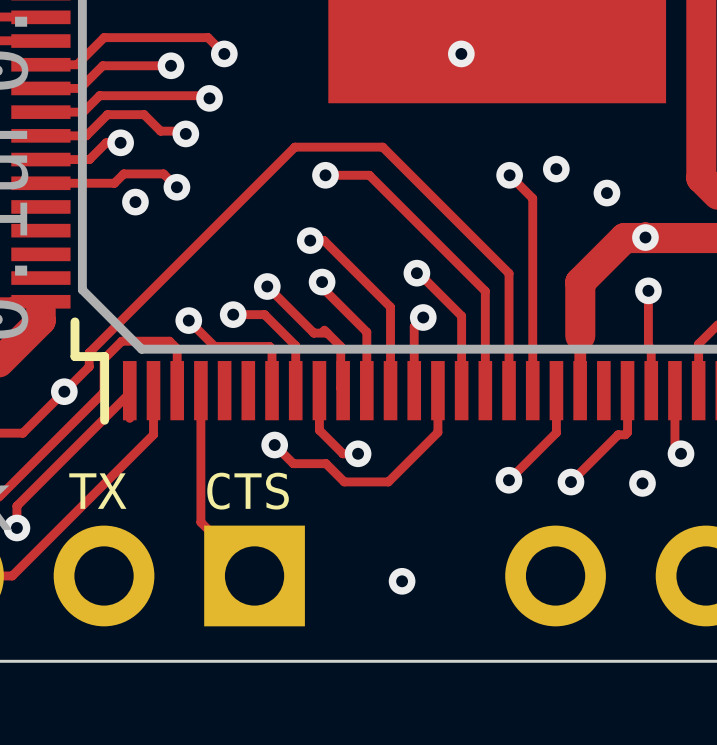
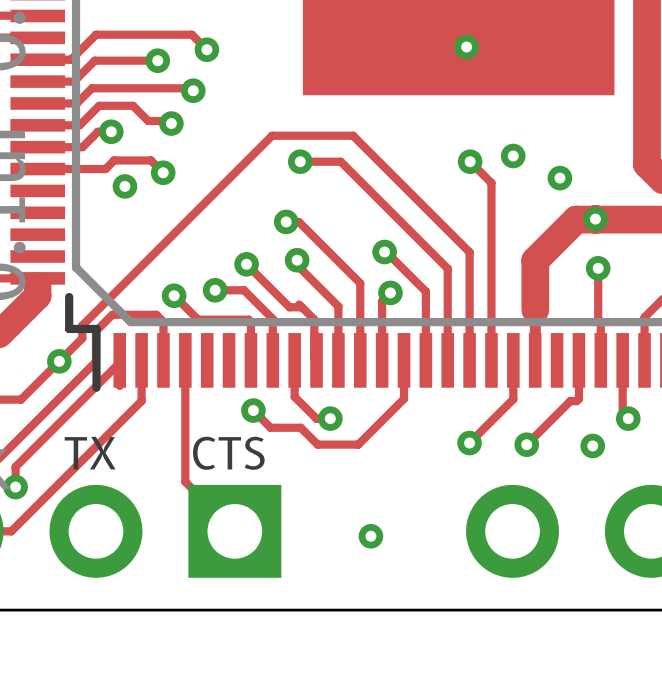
via position: (461, 53) -> (466, 47)

